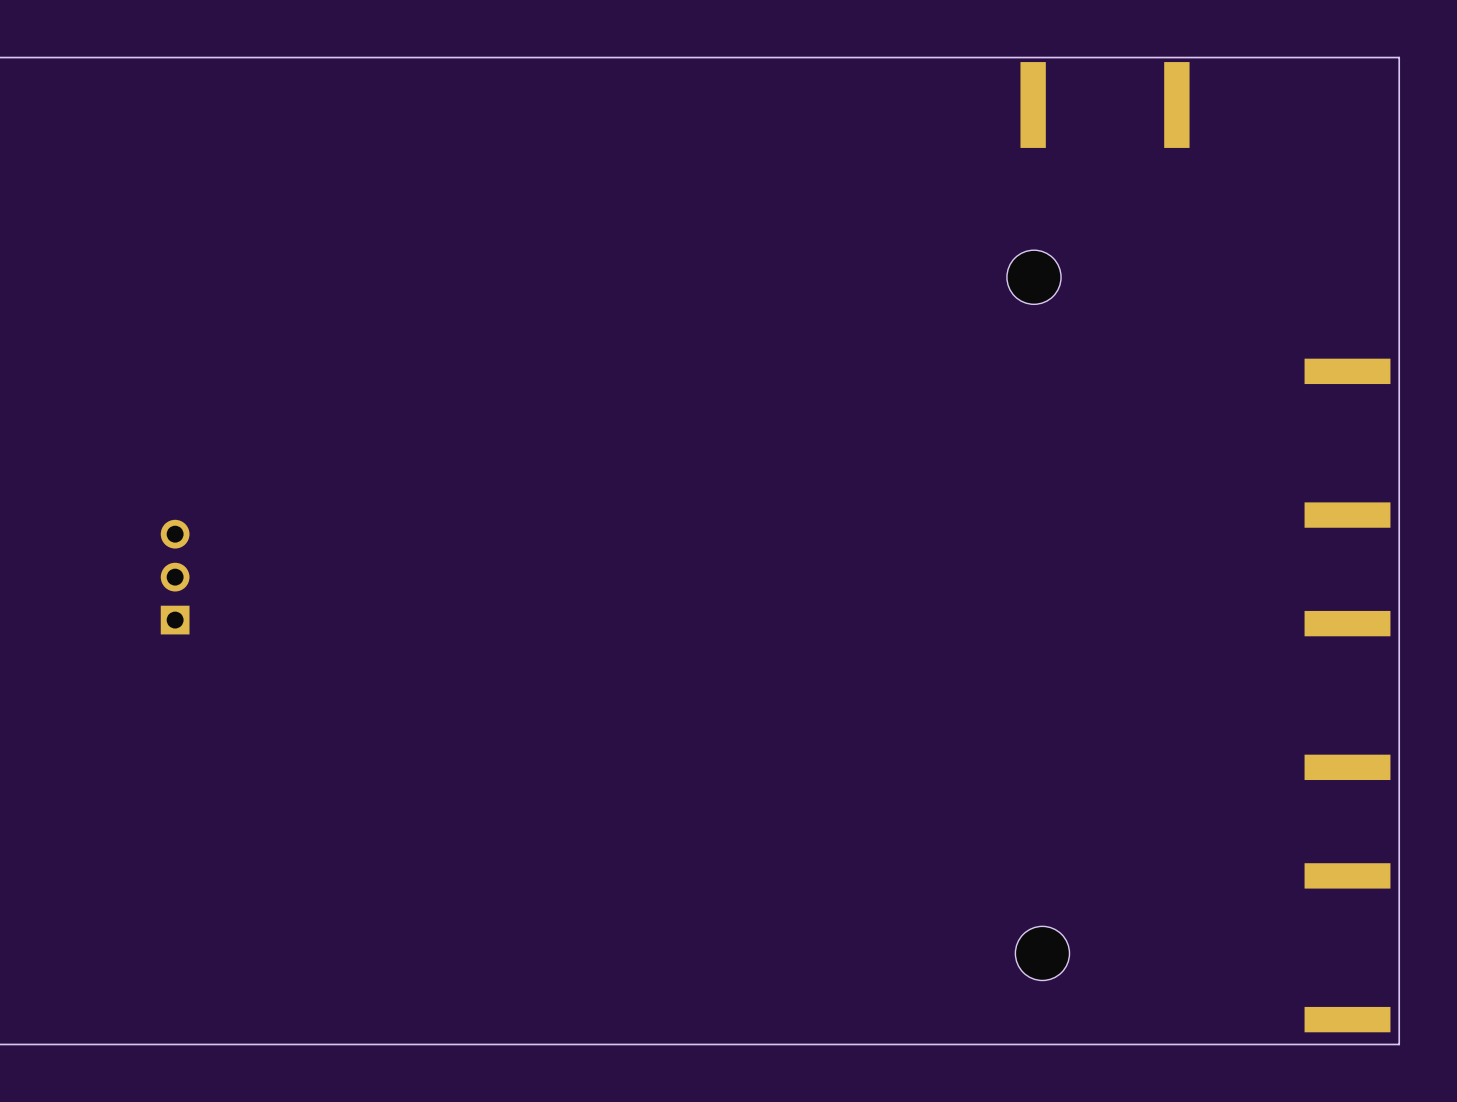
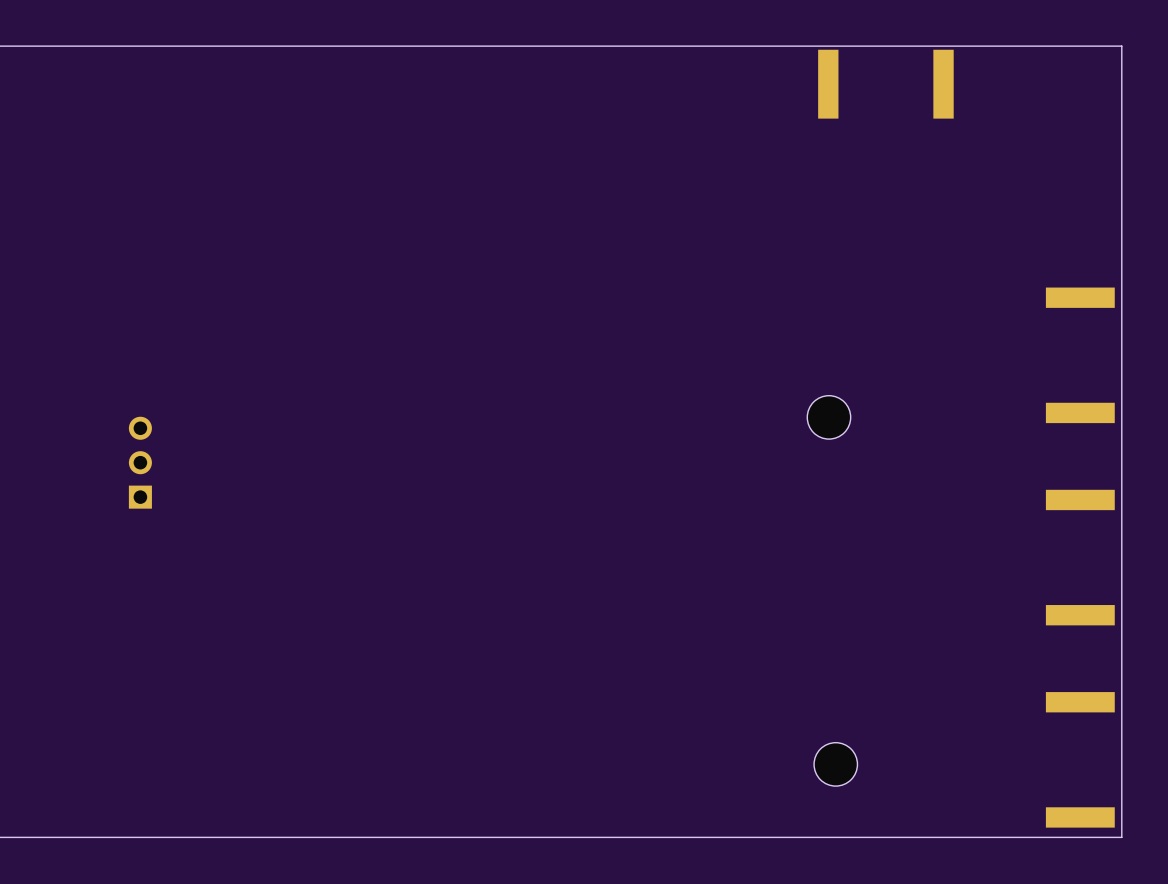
part position: (1033, 277) -> (828, 417)

